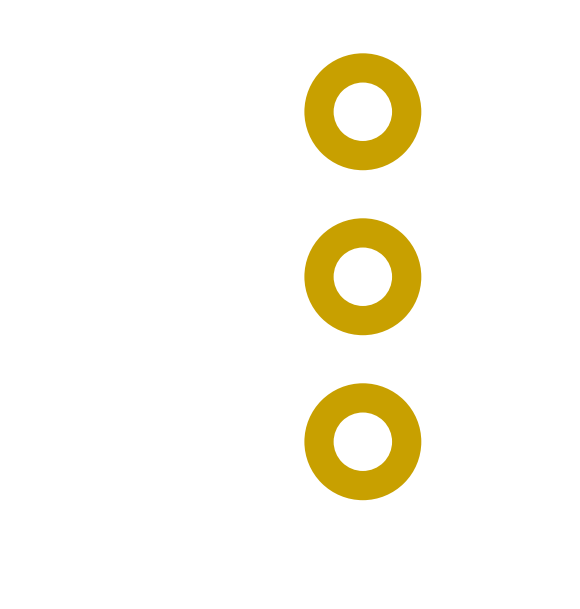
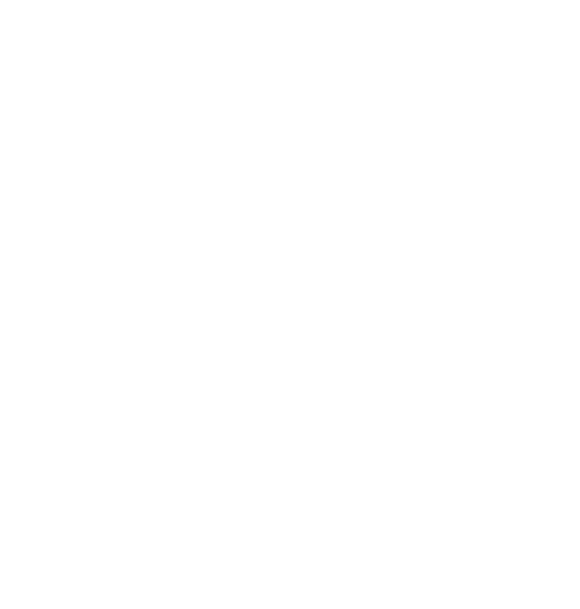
part: (362, 276) -> none

